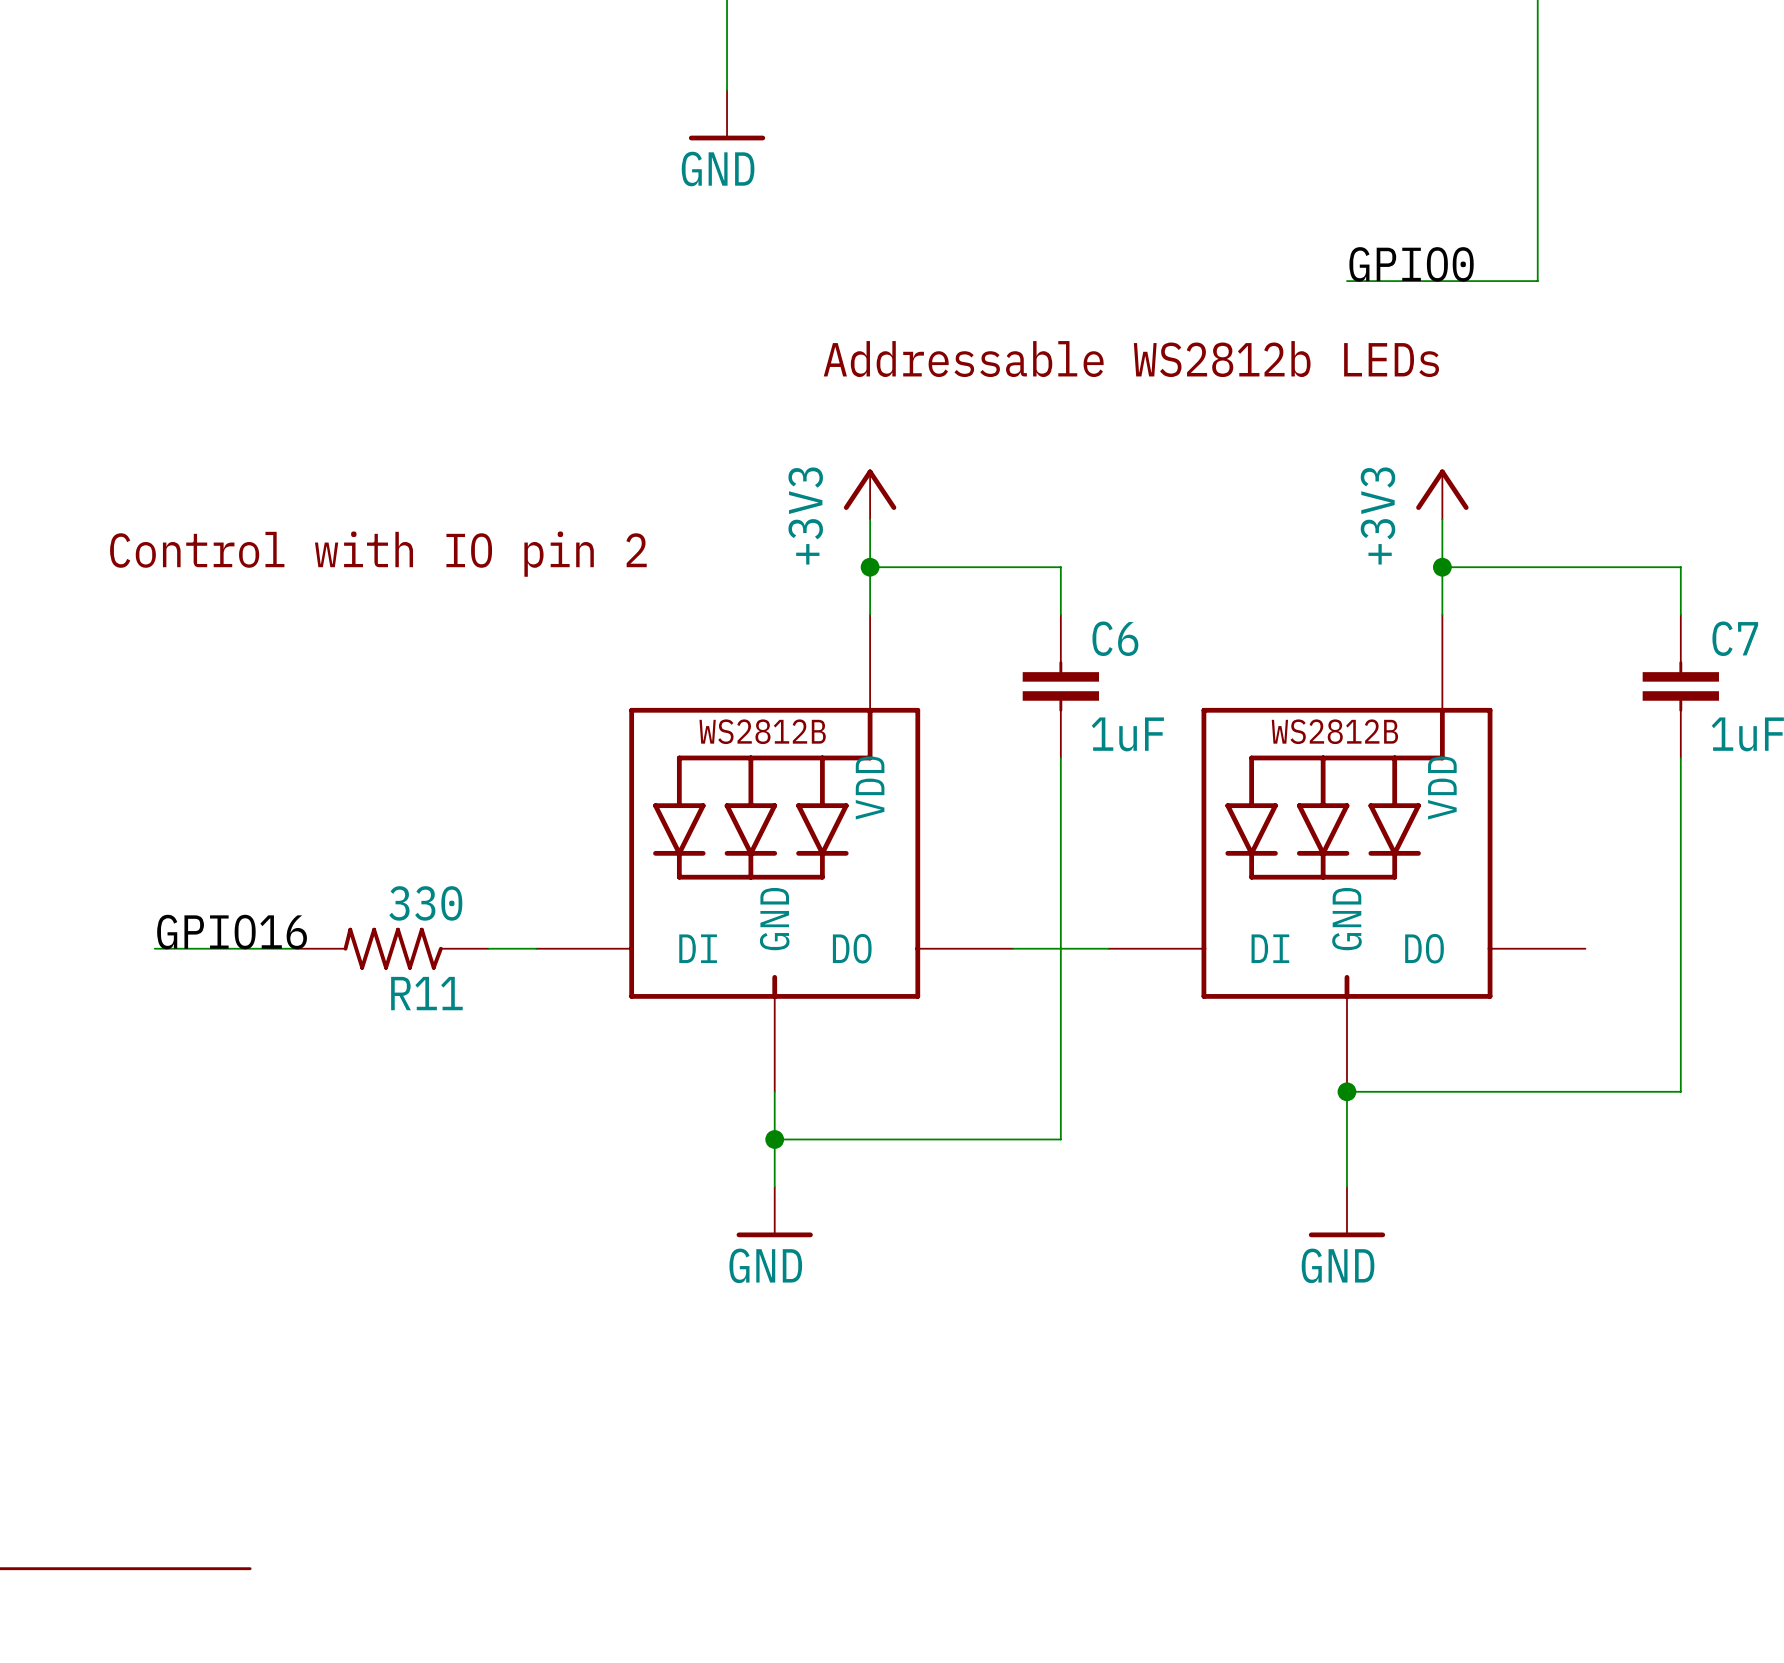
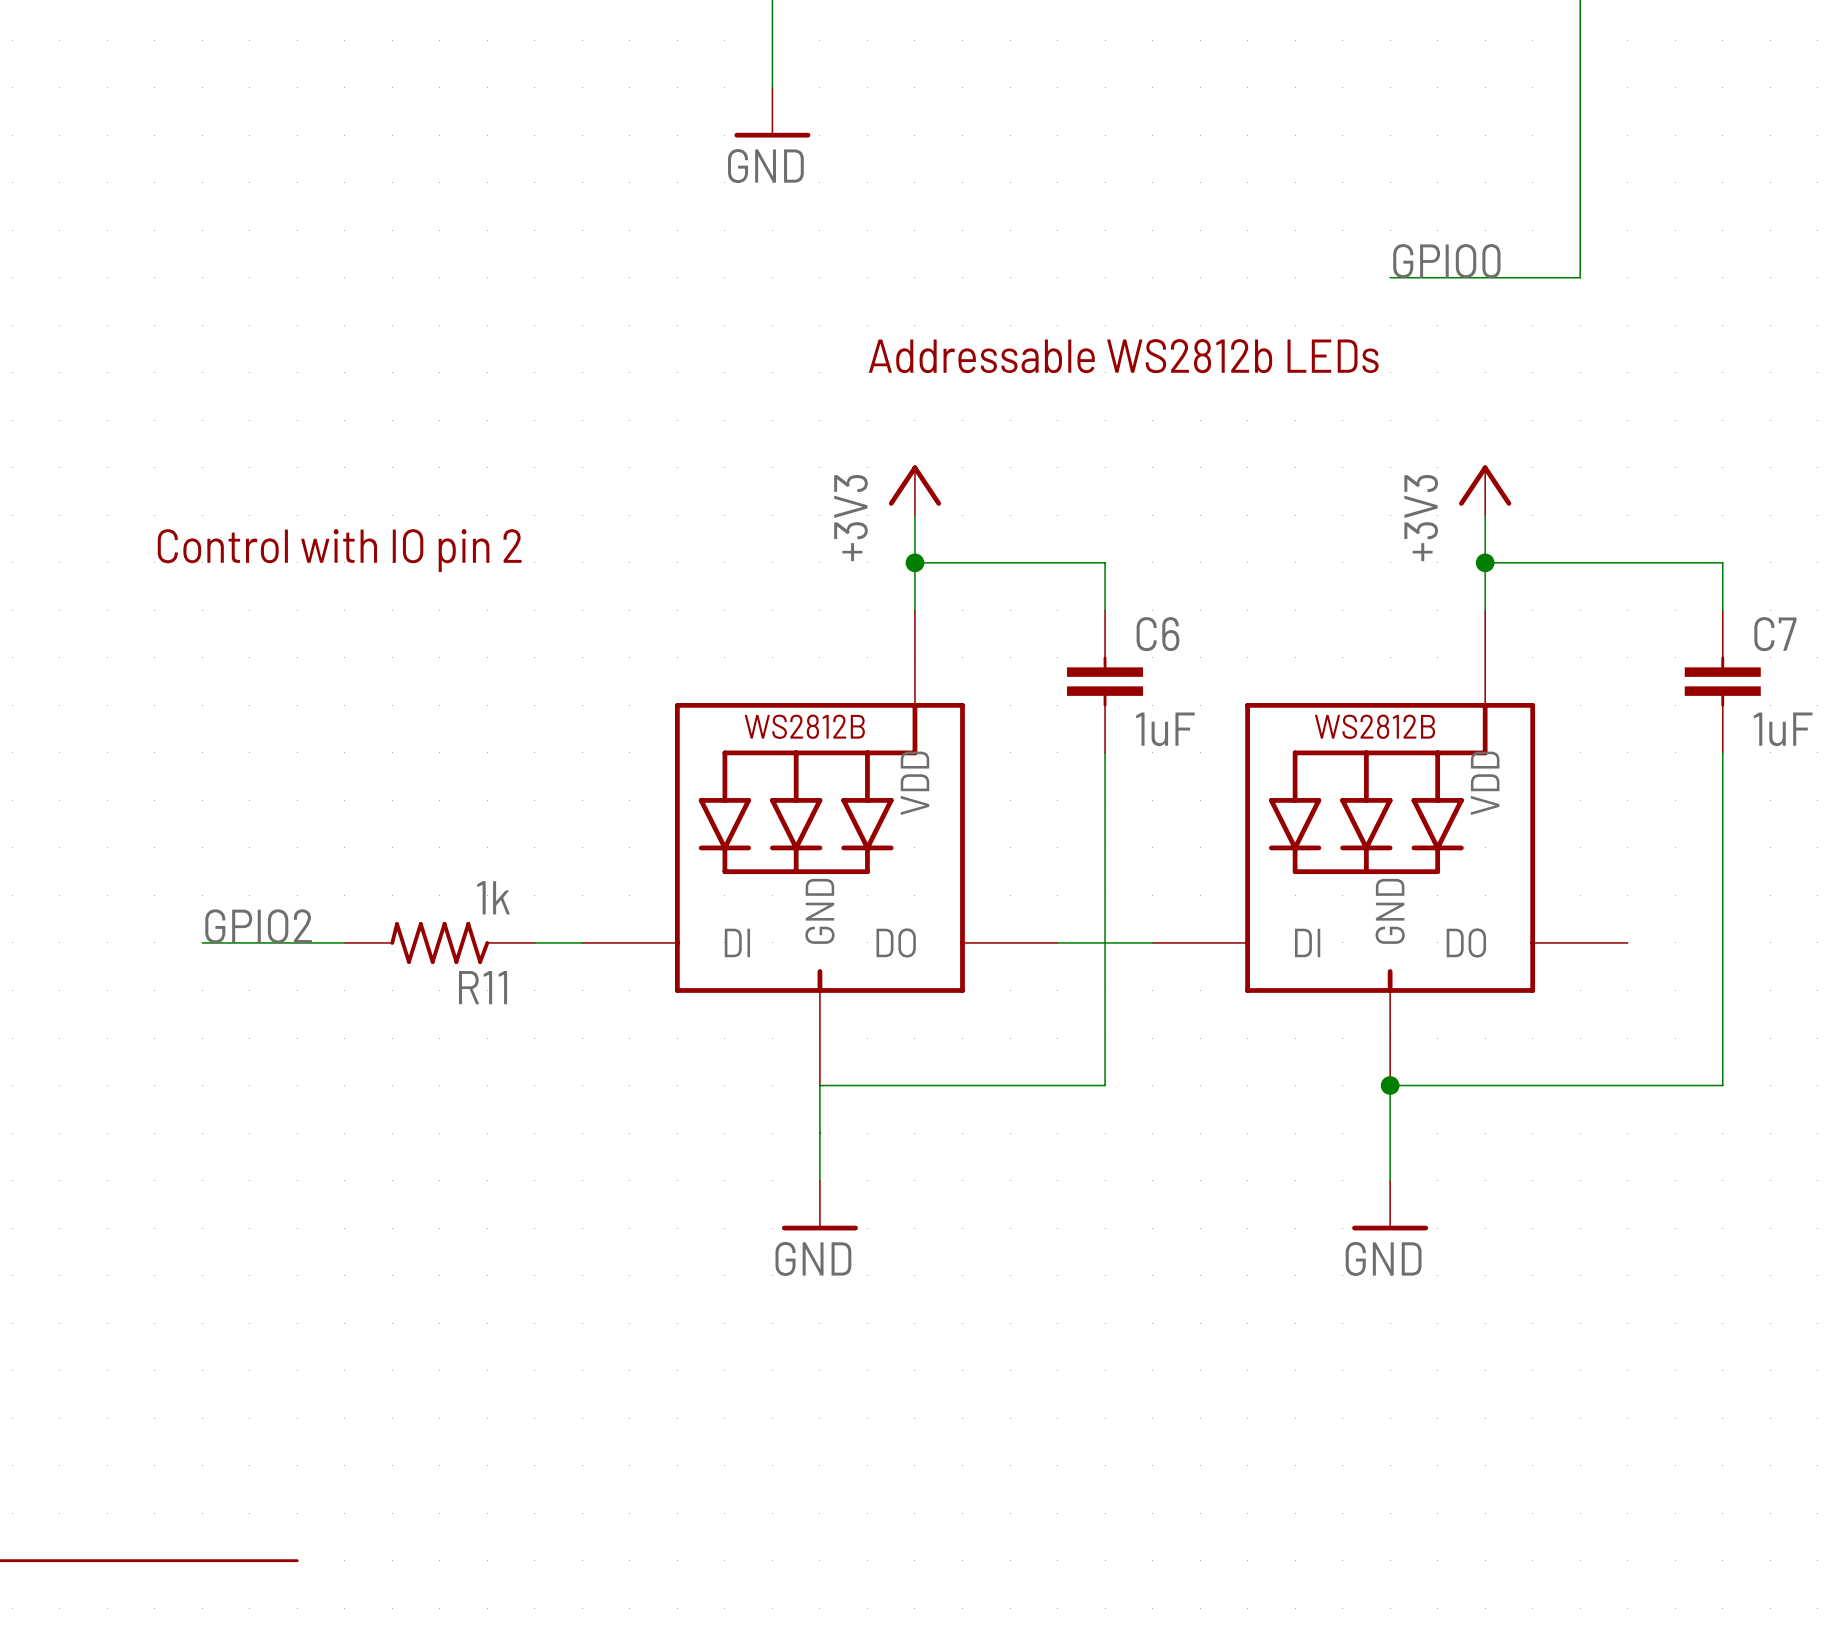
R11 value: 330 (425, 903) -> 1k (493, 897)
label: GPIO16 (232, 932) -> GPIO2 (258, 926)
wire: (1060, 1091) (1060, 1139) (774, 1139) -> (1105, 1085) (819, 1085)
junction: (774, 1139) -> none

